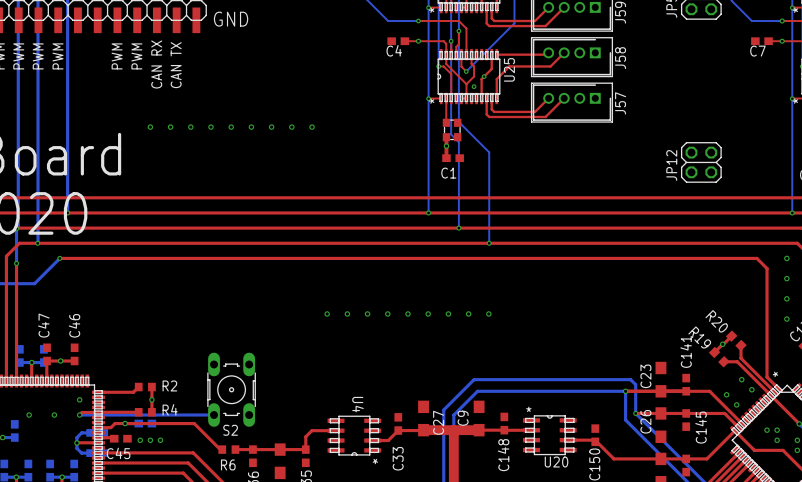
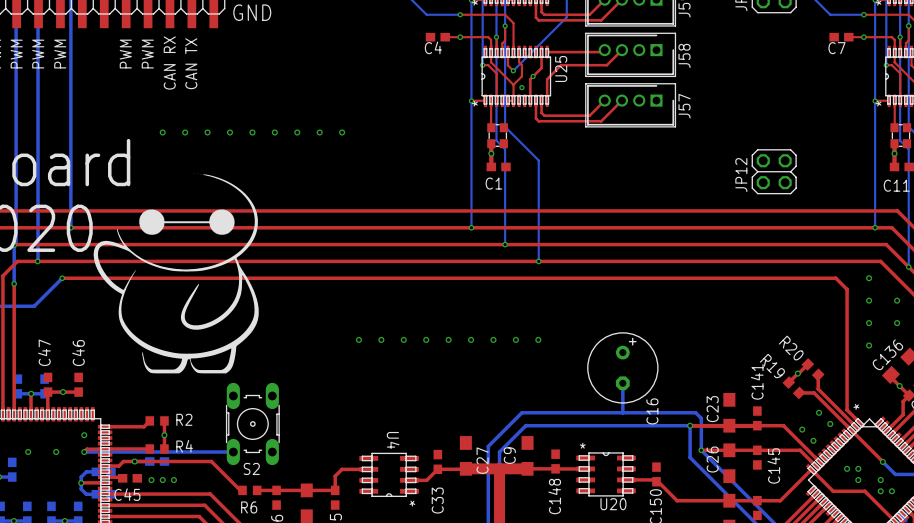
drawing: none -> [93, 173, 259, 374]
drawing: none -> [139, 209, 235, 235]
C16: none -> (622, 367)
bottom track: none -> (622, 383) (622, 412)

